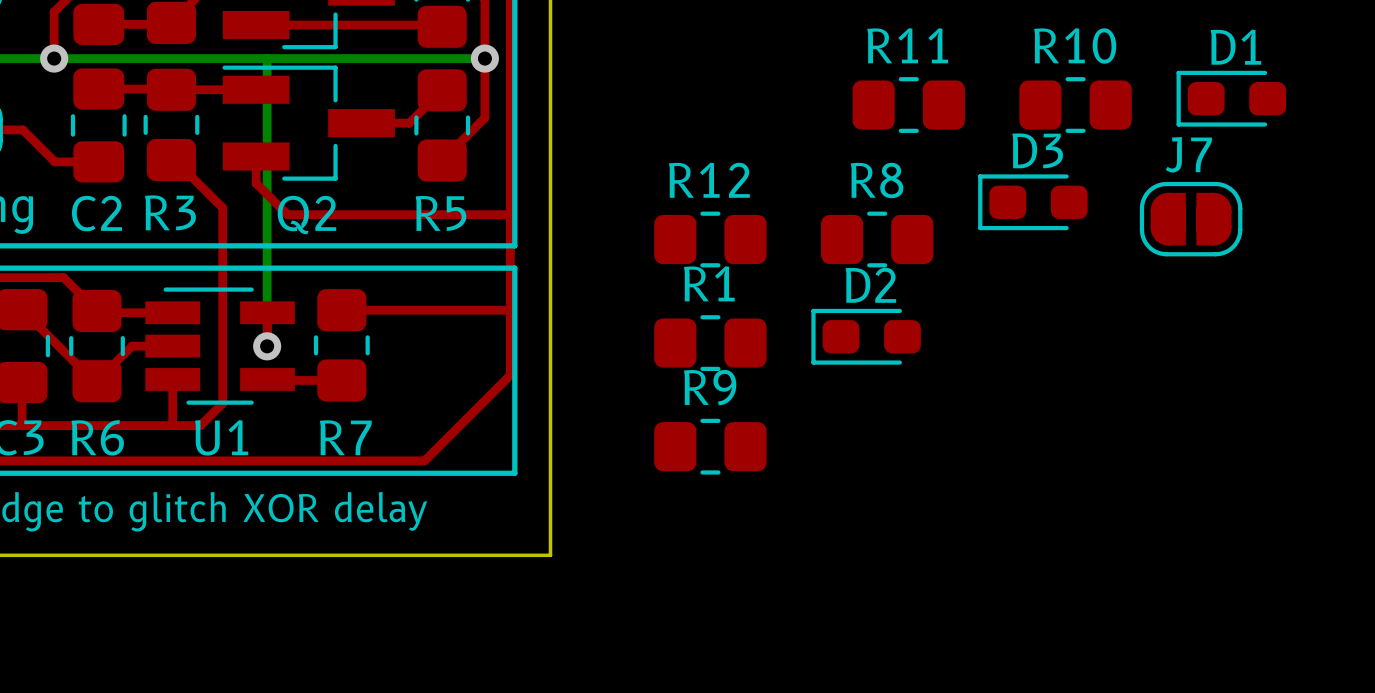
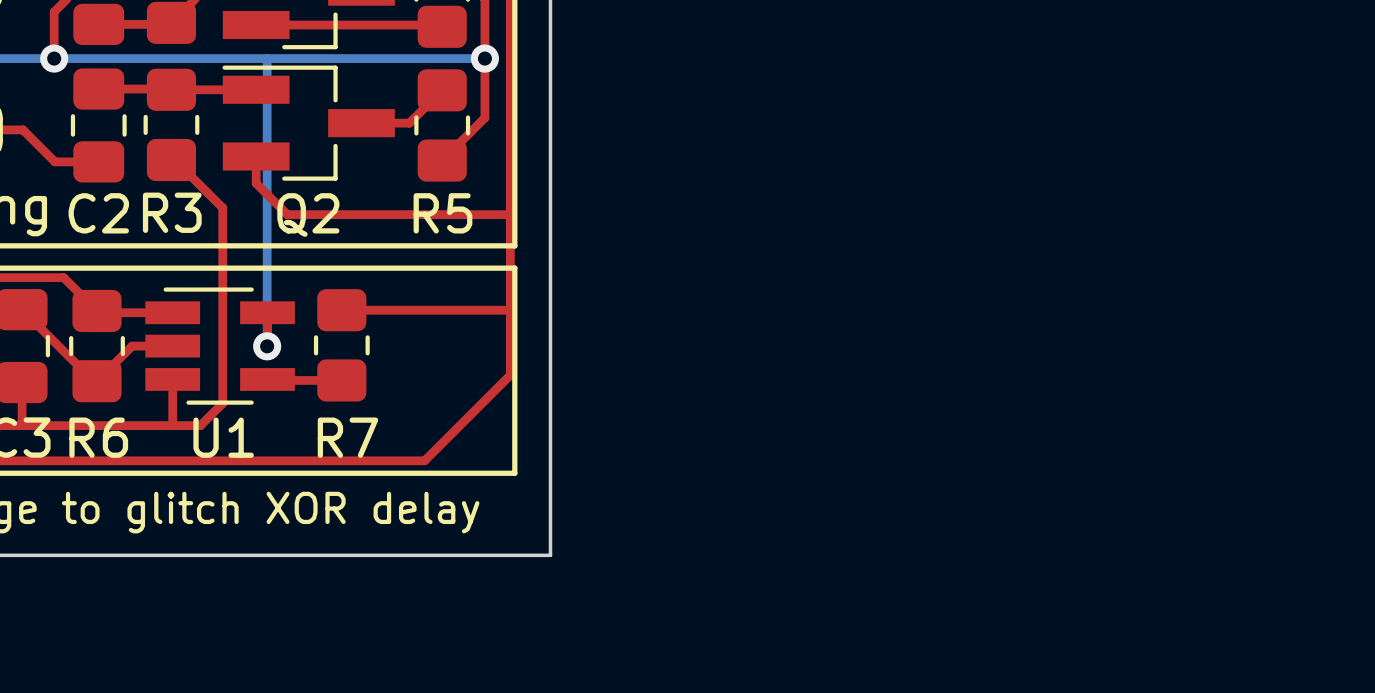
D1: (1231, 98) -> none
R11: (908, 105) -> none
R10: (1075, 105) -> none
D3: (1032, 202) -> none
J7: (1191, 219) -> none
R12: (710, 239) -> none
R8: (877, 239) -> none
D2: (866, 336) -> none
R1: (710, 343) -> none
R9: (710, 446) -> none

